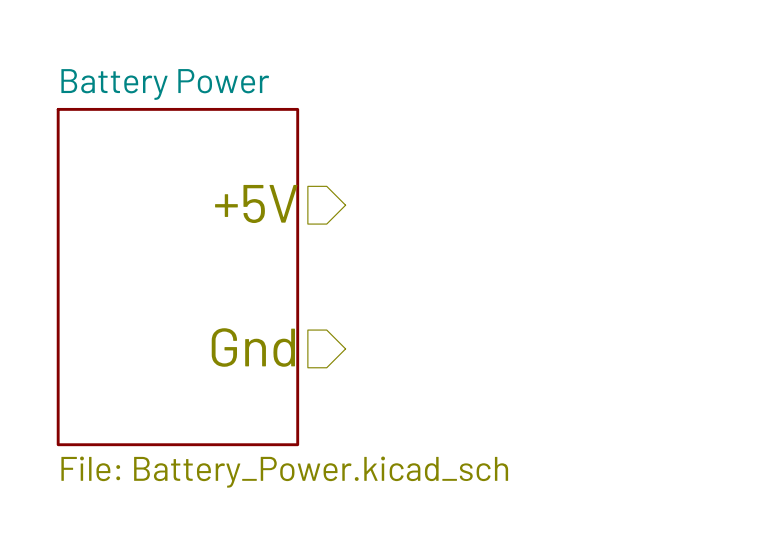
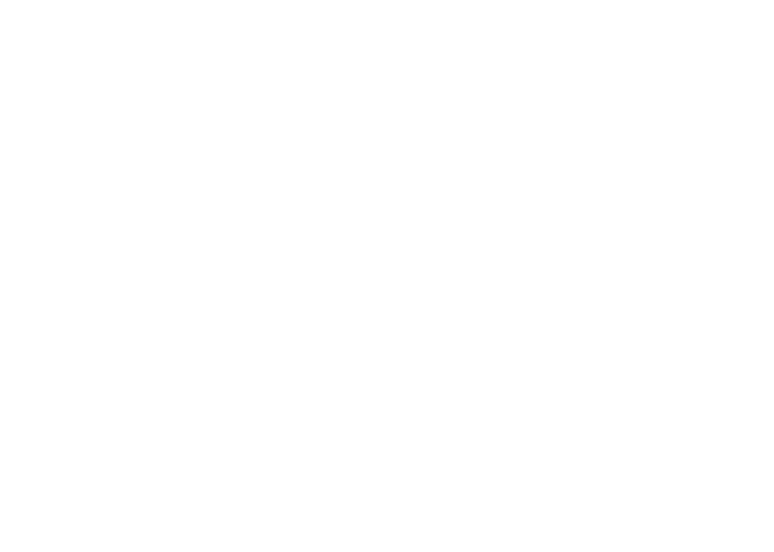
hierarchical label: +5V (256, 203) -> none
sheet Battery Power: File: Battery_Power.kicad_sch (177, 277) -> none
hierarchical label: Gnd (253, 347) -> none

